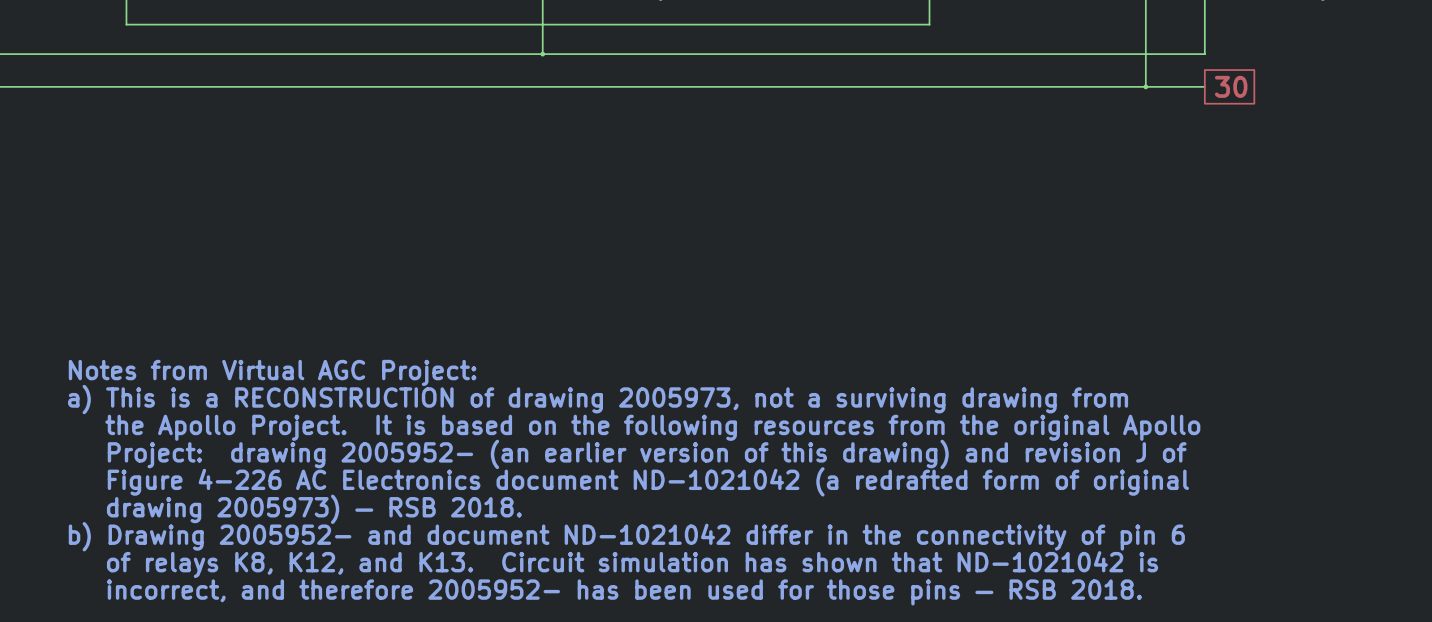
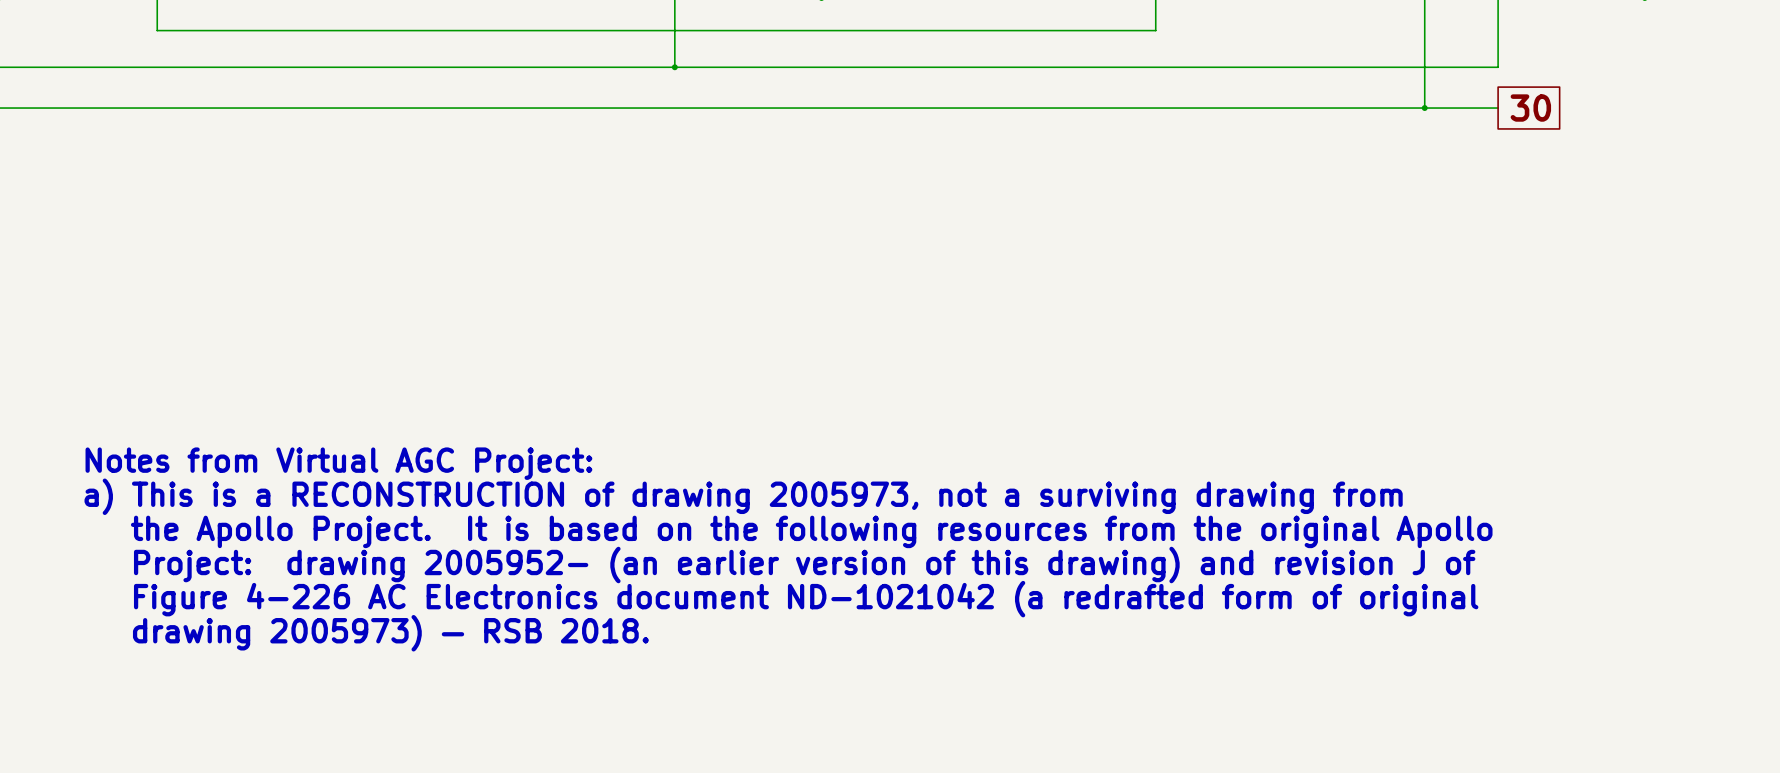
text: b) Drawing 2005952- and document ND-1021042 differ in the connectivity of pin 6 (626, 536) -> none
text: of relays K8, K12, and K13. Circuit simulation has shown that ND-1021042 is (632, 564) -> none
text: incorrect, and therefore 2005952- has been used for those pins — RSB 2018. (624, 592) -> none

